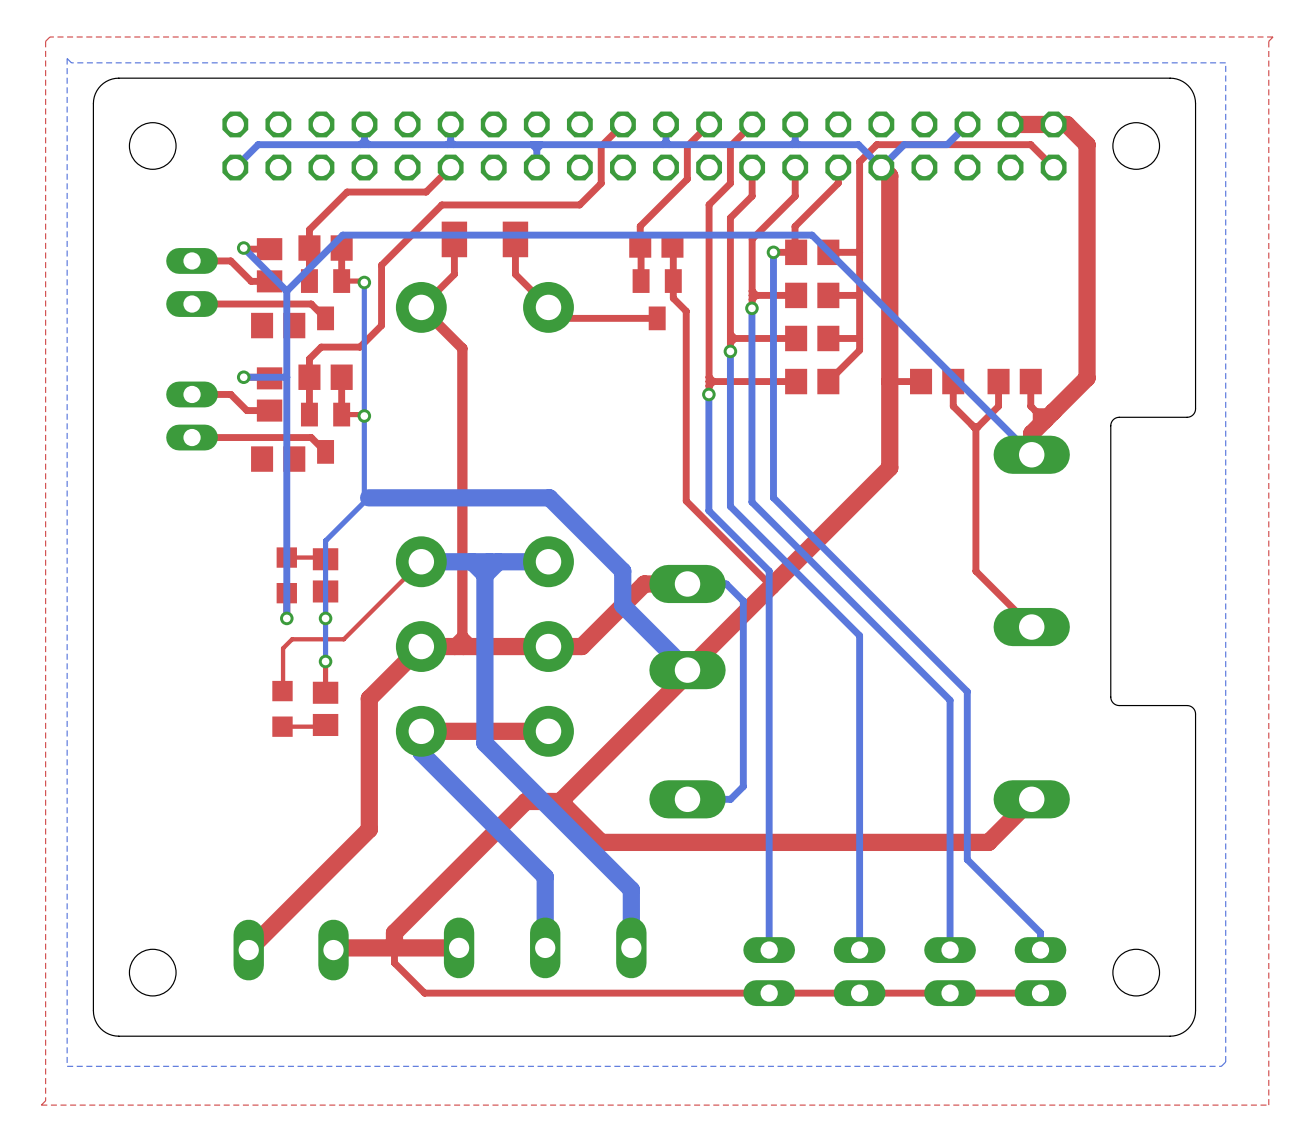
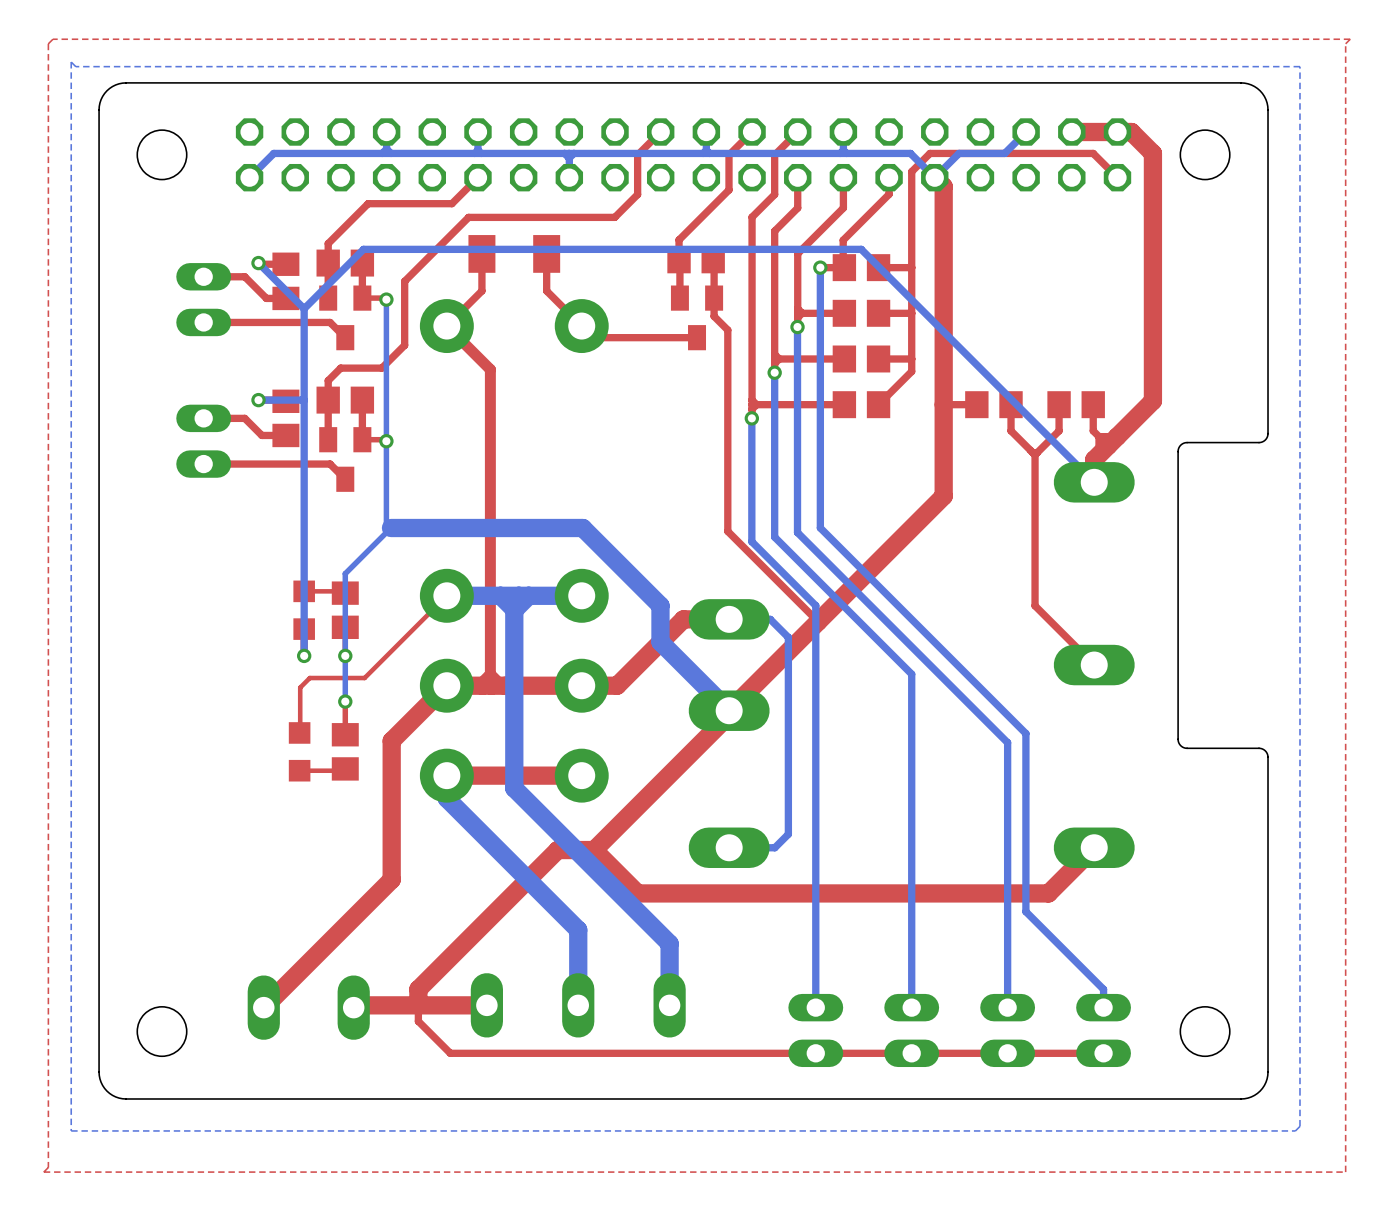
part: (278, 325) -> none
part: (278, 459) -> none

